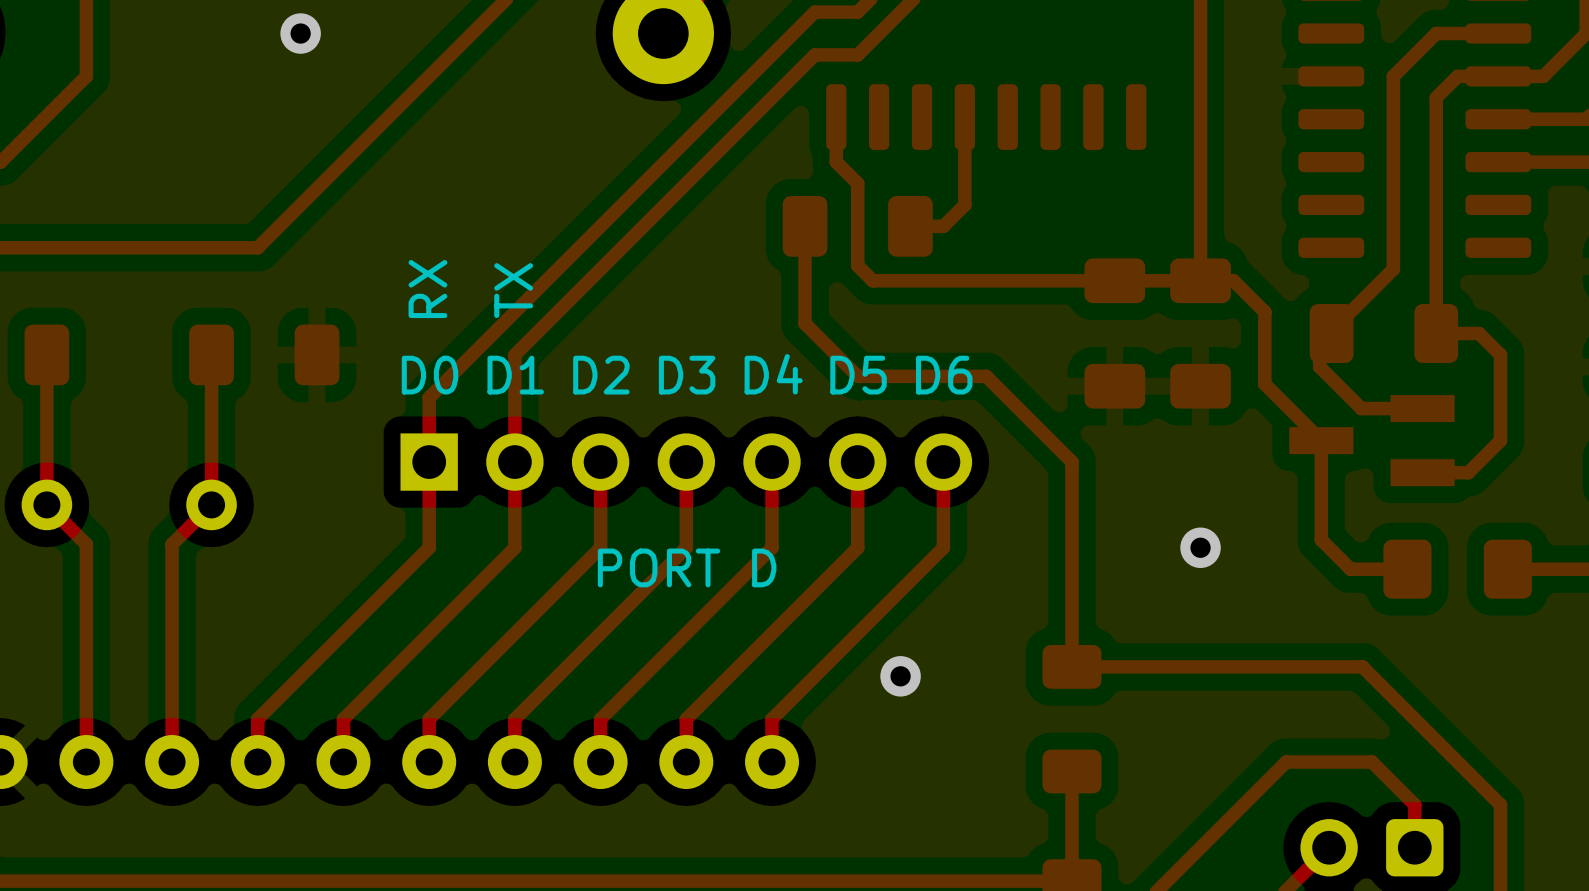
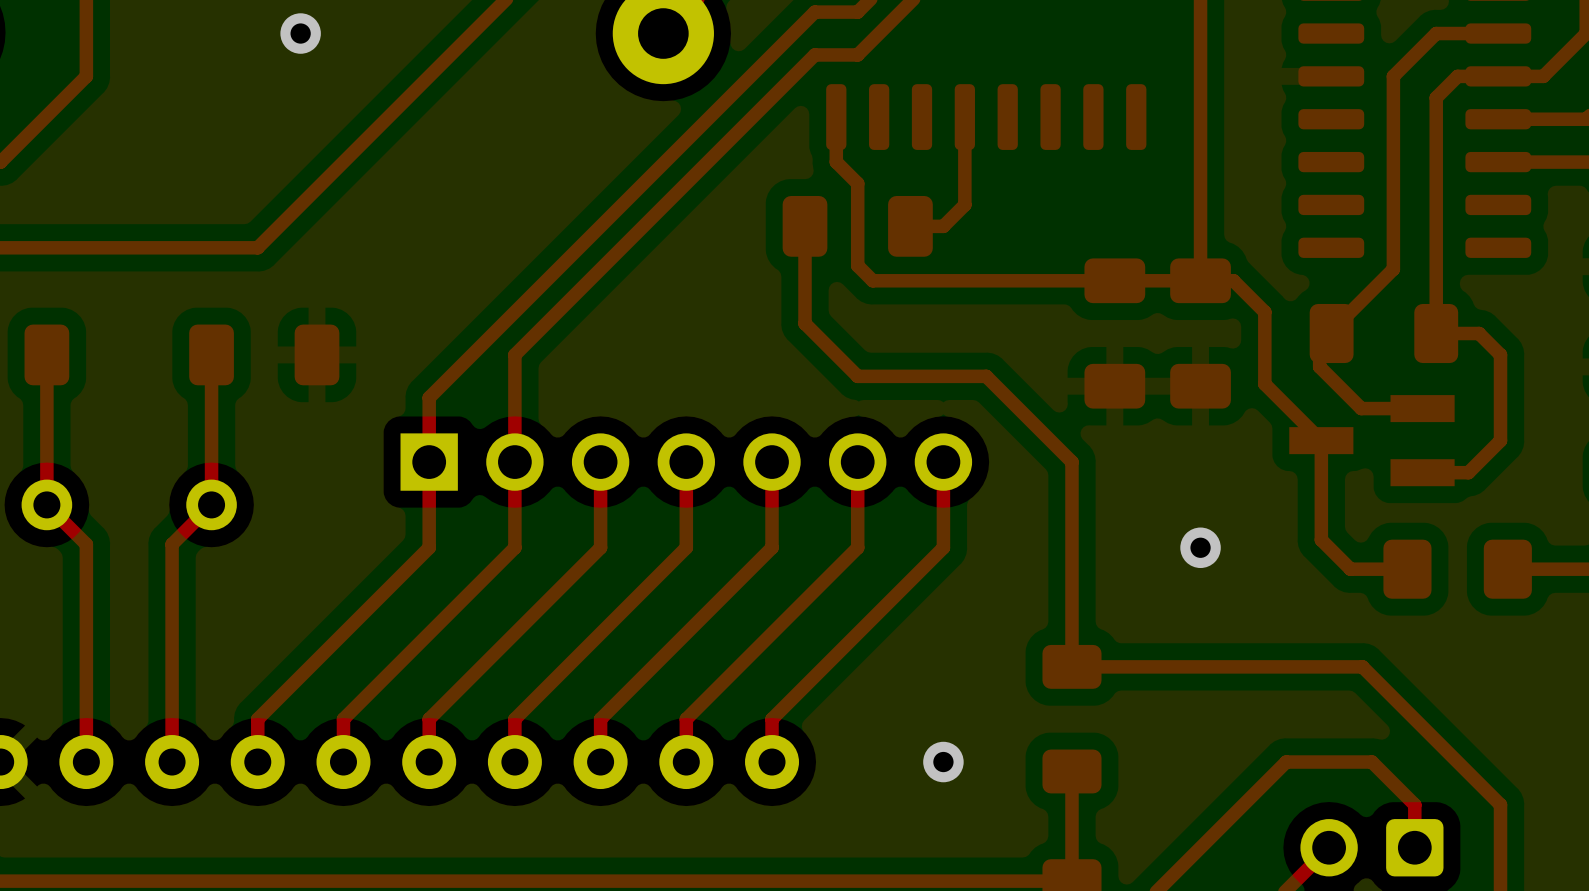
text: RX (427, 289) -> none
text: TX (513, 290) -> none
text: D4 (773, 374) -> none
text: D0 (429, 375) -> none
text: D1 (515, 375) -> none
text: D2 (601, 375) -> none
text: D3 (687, 375) -> none
text: D5 (858, 375) -> none
text: D6 (944, 375) -> none
text: PORT D (687, 567) -> none
via position: (900, 676) -> (943, 762)

